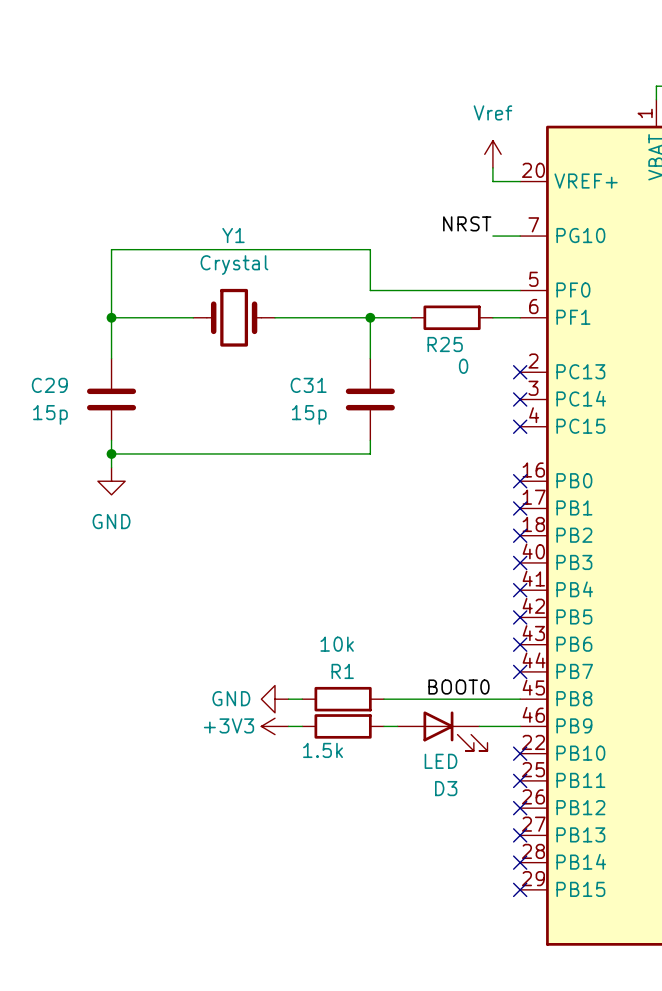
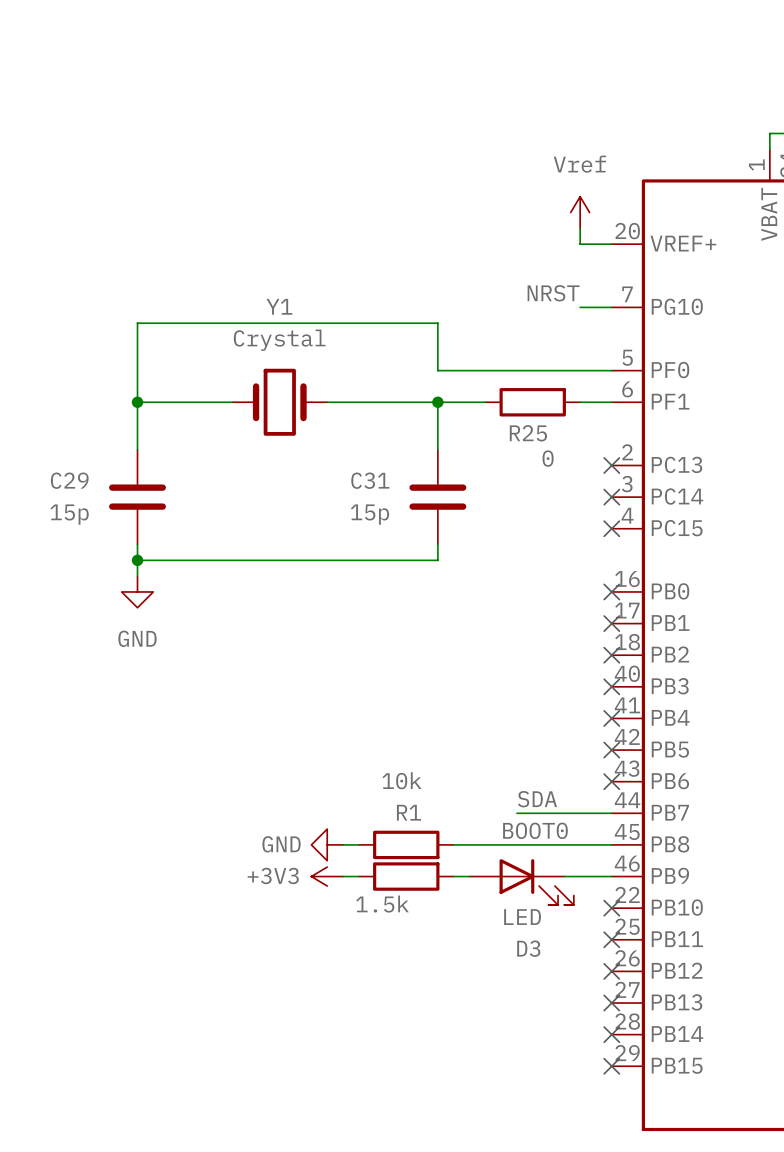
label: none -> SDA (537, 799)
wire: none -> (516, 813) (611, 813)
no-connect mark: (520, 671) -> none

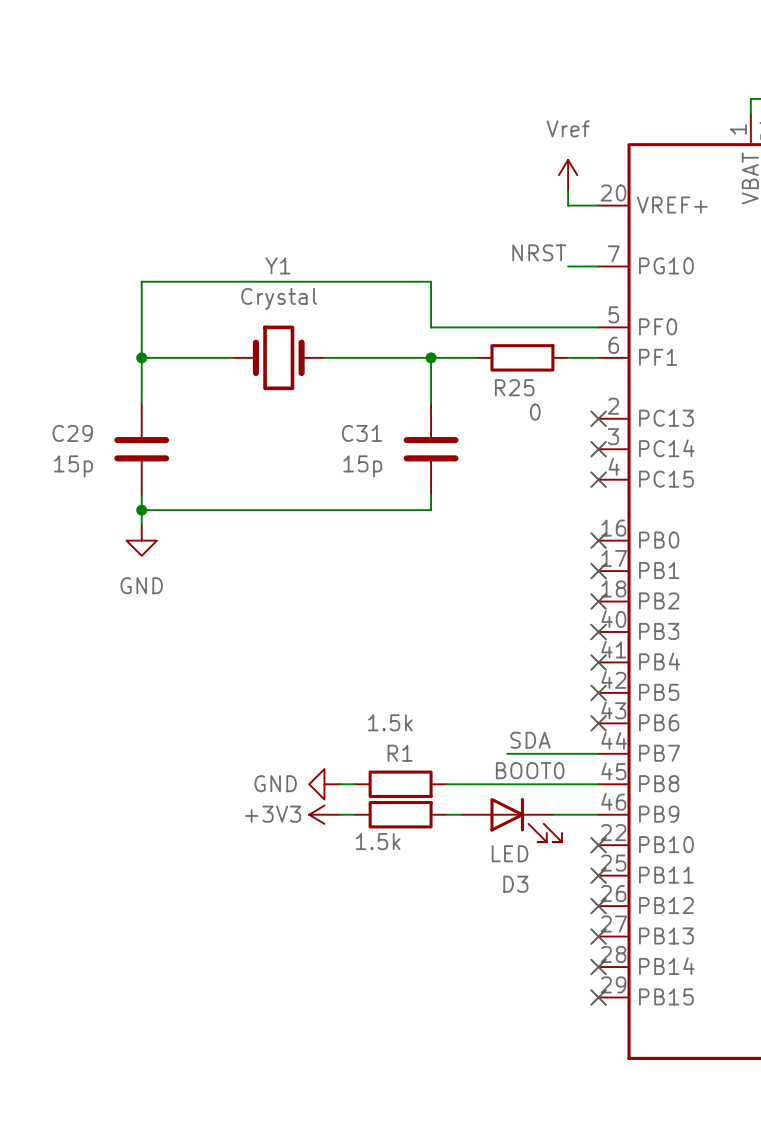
R1 value: 10k (401, 780) -> 1.5k (390, 722)

